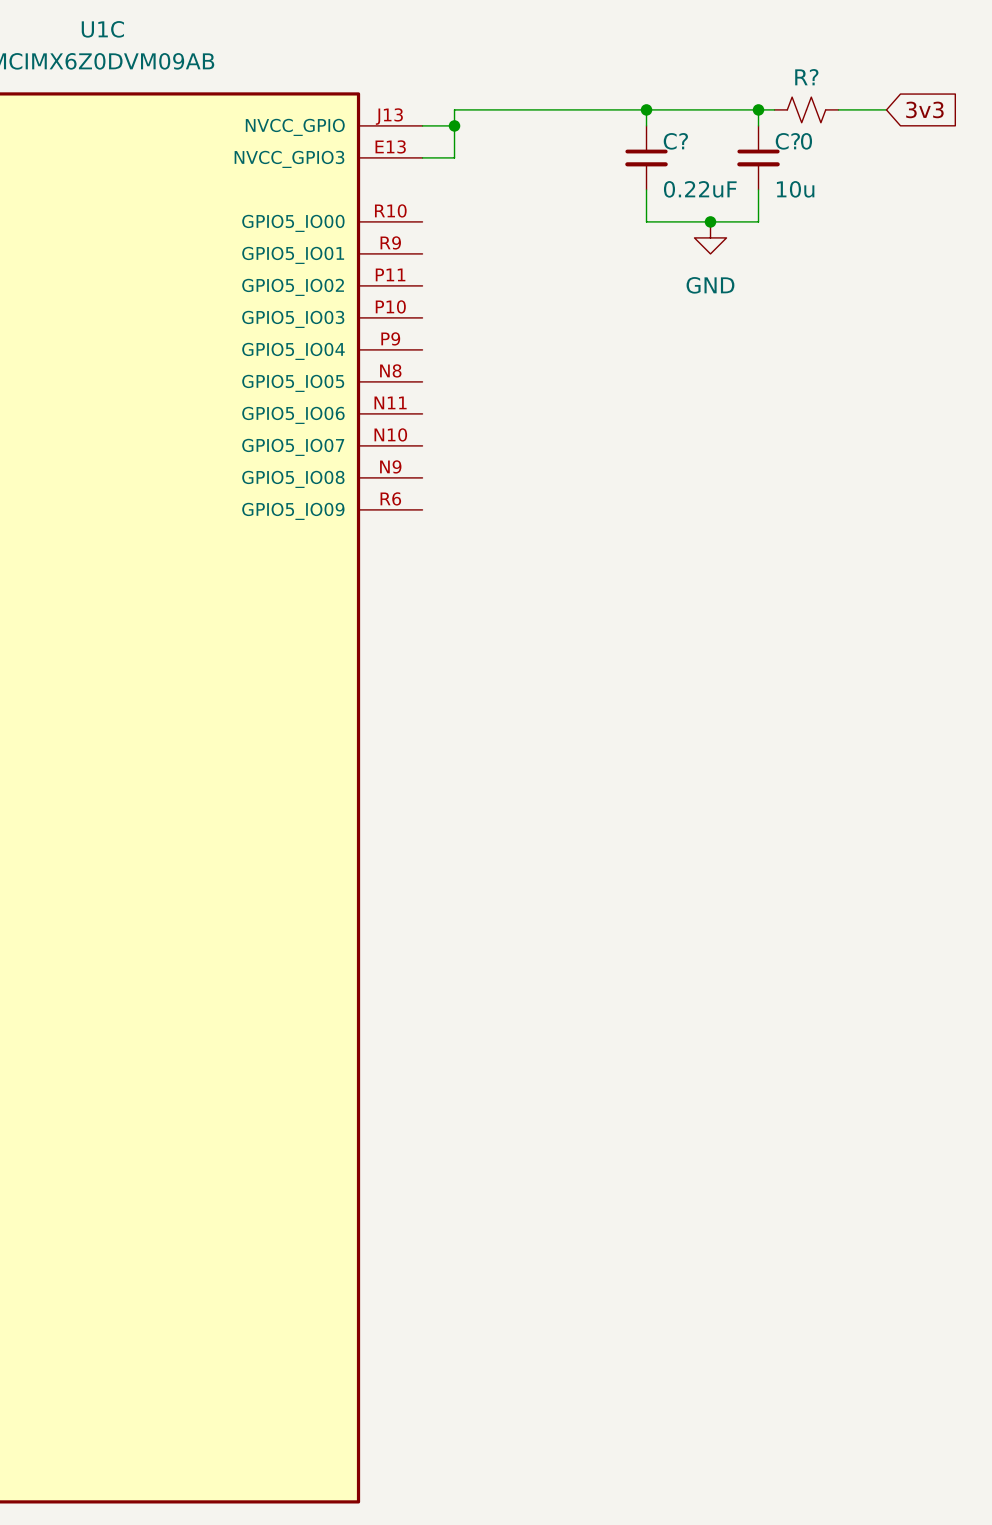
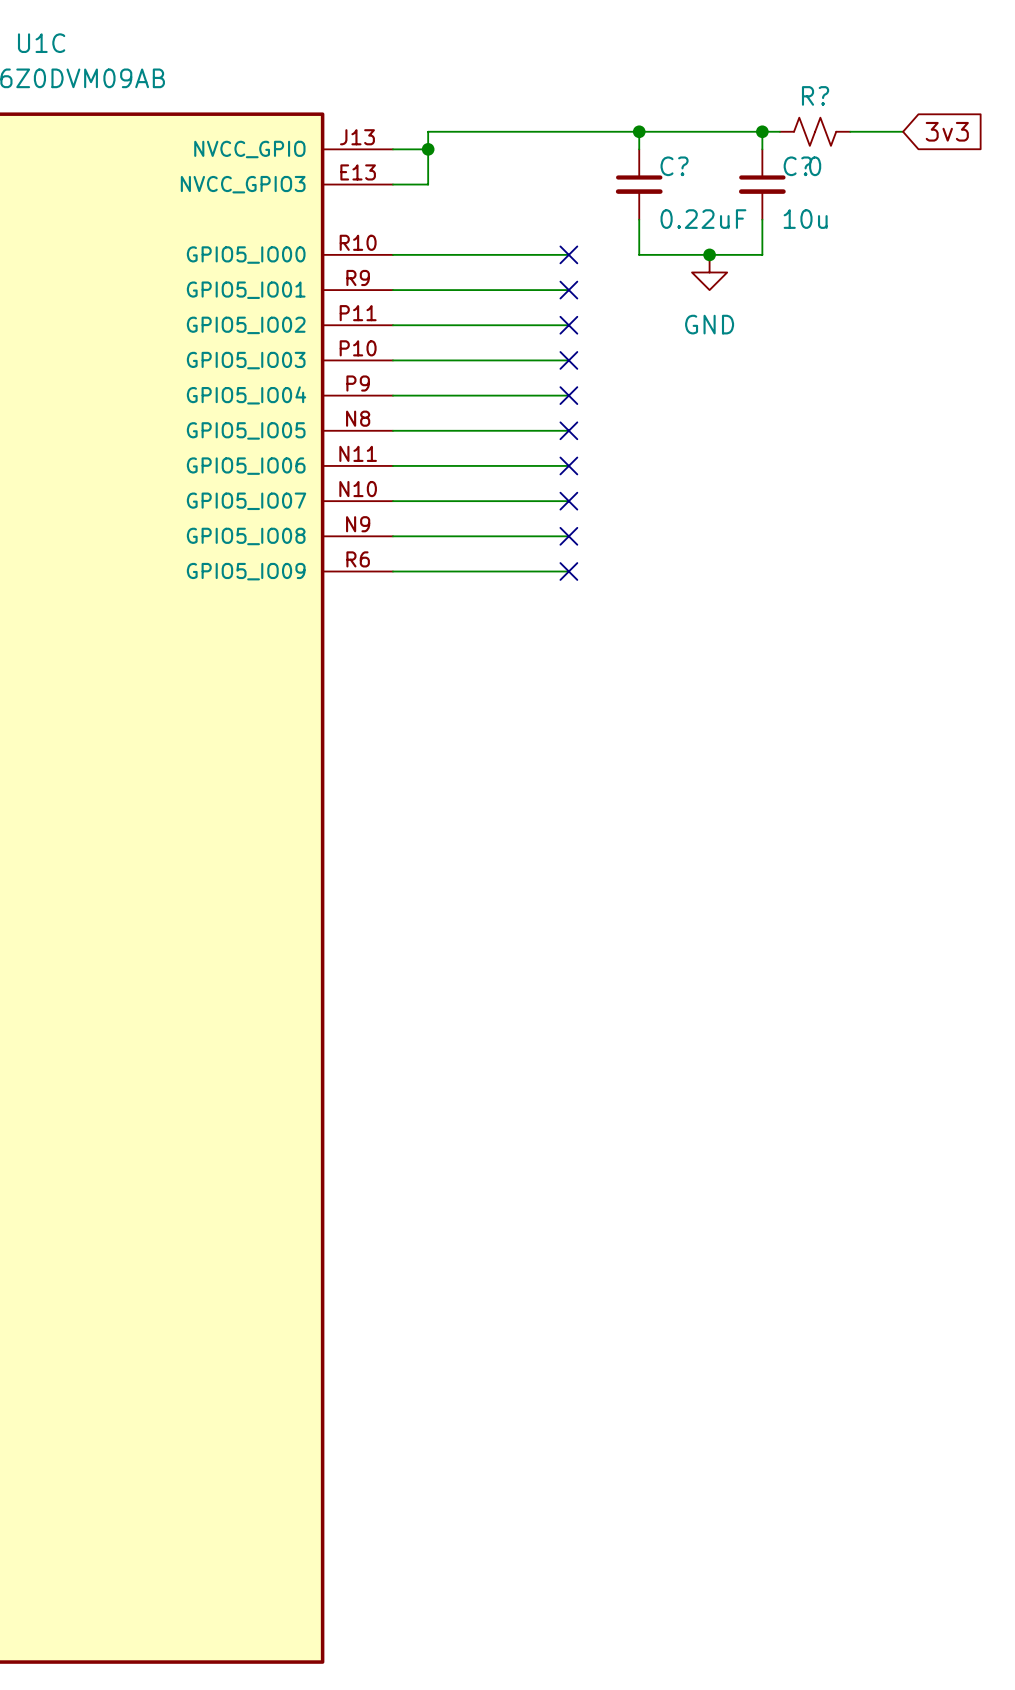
wire: none -> (392, 254) (568, 254)
no-connect mark: none -> (568, 254)
wire: none -> (392, 290) (568, 290)
no-connect mark: none -> (568, 290)
wire: none -> (392, 325) (568, 325)
no-connect mark: none -> (568, 325)
wire: none -> (392, 360) (568, 360)
no-connect mark: none -> (568, 360)
wire: none -> (392, 395) (568, 395)
no-connect mark: none -> (568, 395)
wire: none -> (392, 430) (568, 430)
no-connect mark: none -> (568, 430)
wire: none -> (392, 465) (568, 465)
no-connect mark: none -> (568, 465)
wire: none -> (392, 501) (568, 501)
no-connect mark: none -> (568, 501)
wire: none -> (392, 536) (568, 536)
no-connect mark: none -> (568, 536)
wire: none -> (392, 571) (568, 571)
no-connect mark: none -> (568, 571)

